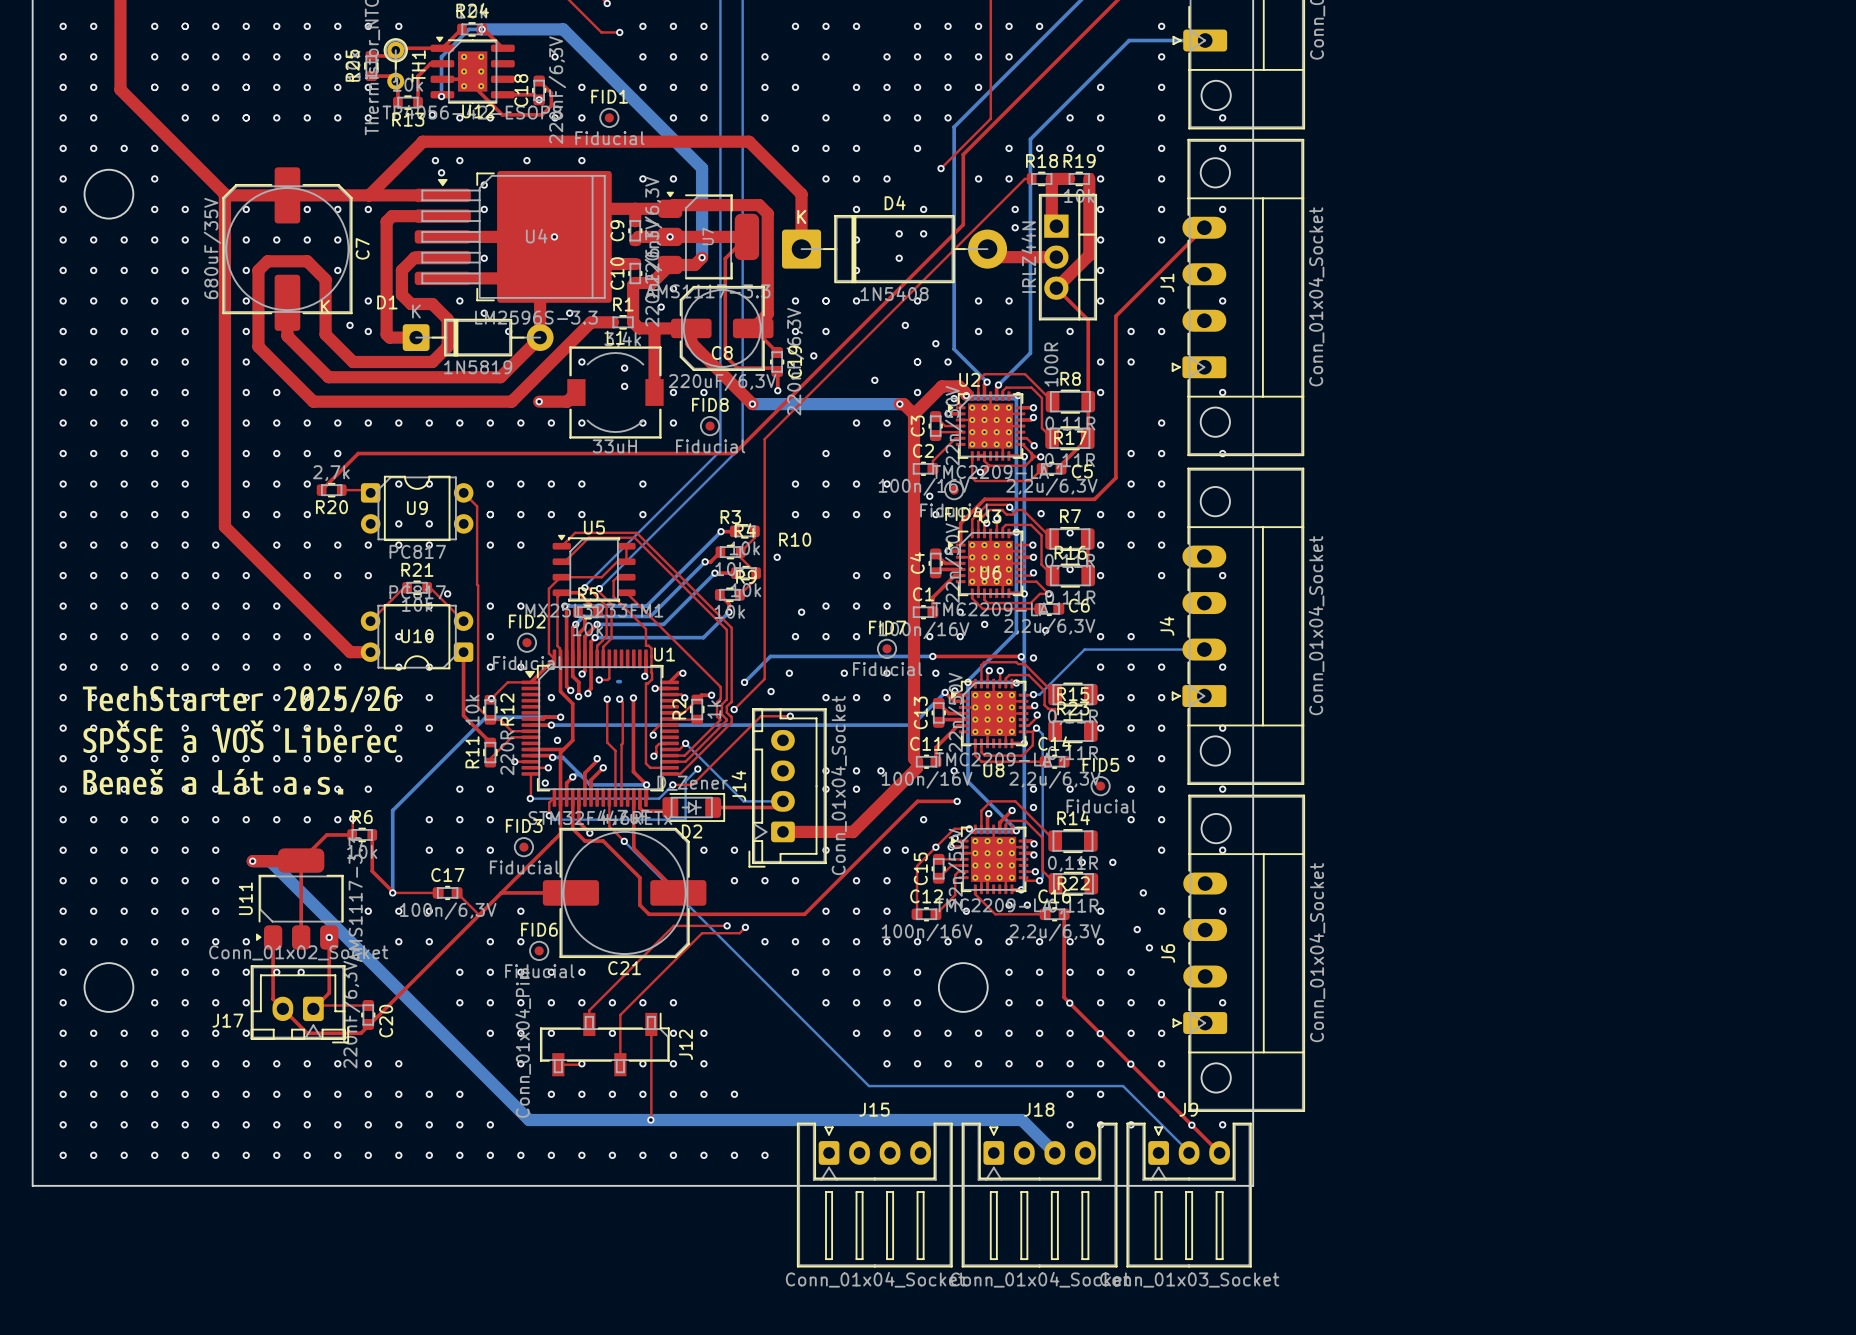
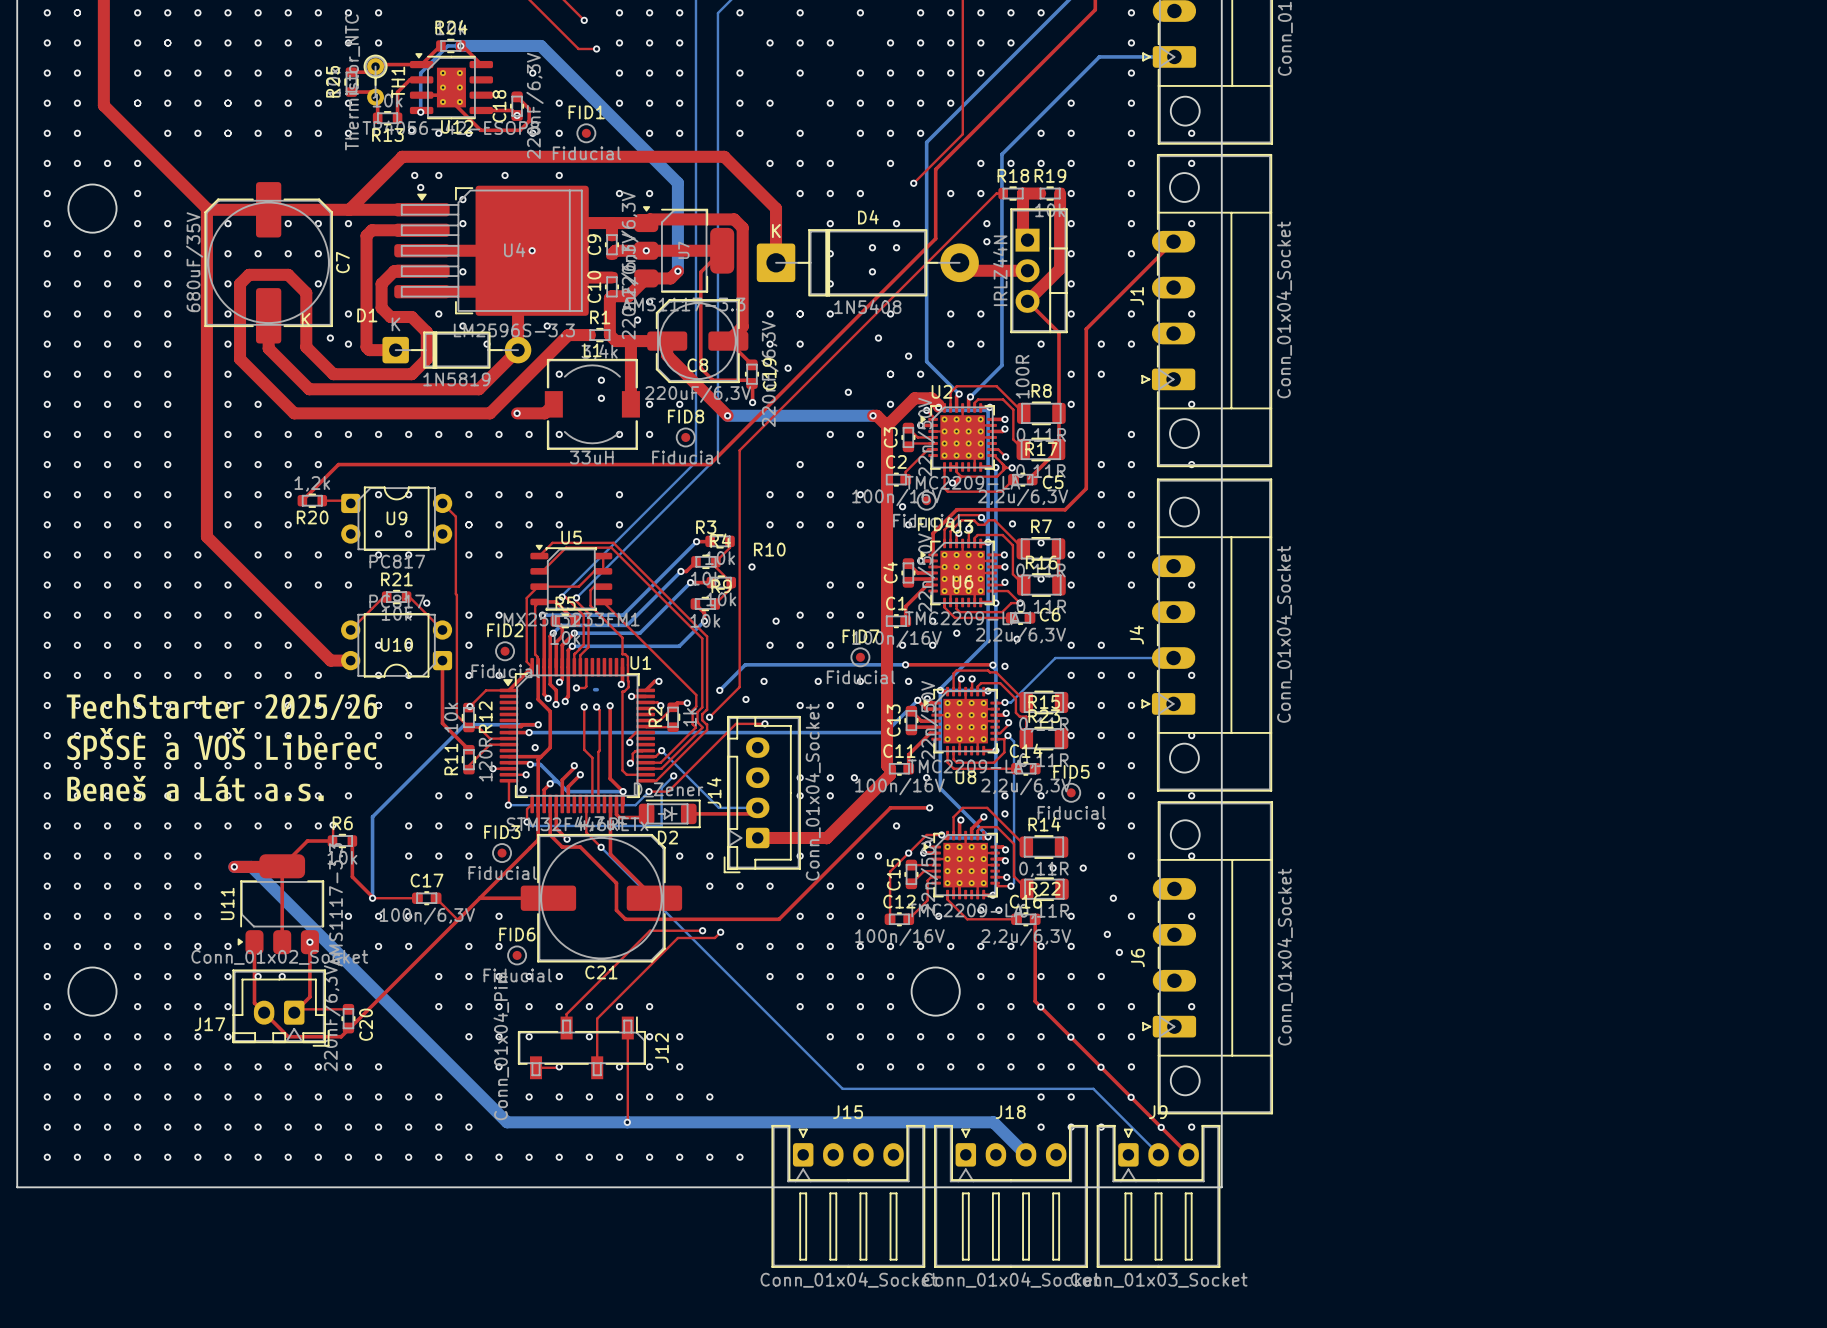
R20 value: 2,7k (331, 473) -> 1,2k (312, 483)
R11 value: 220R (507, 752) -> 120R (485, 759)

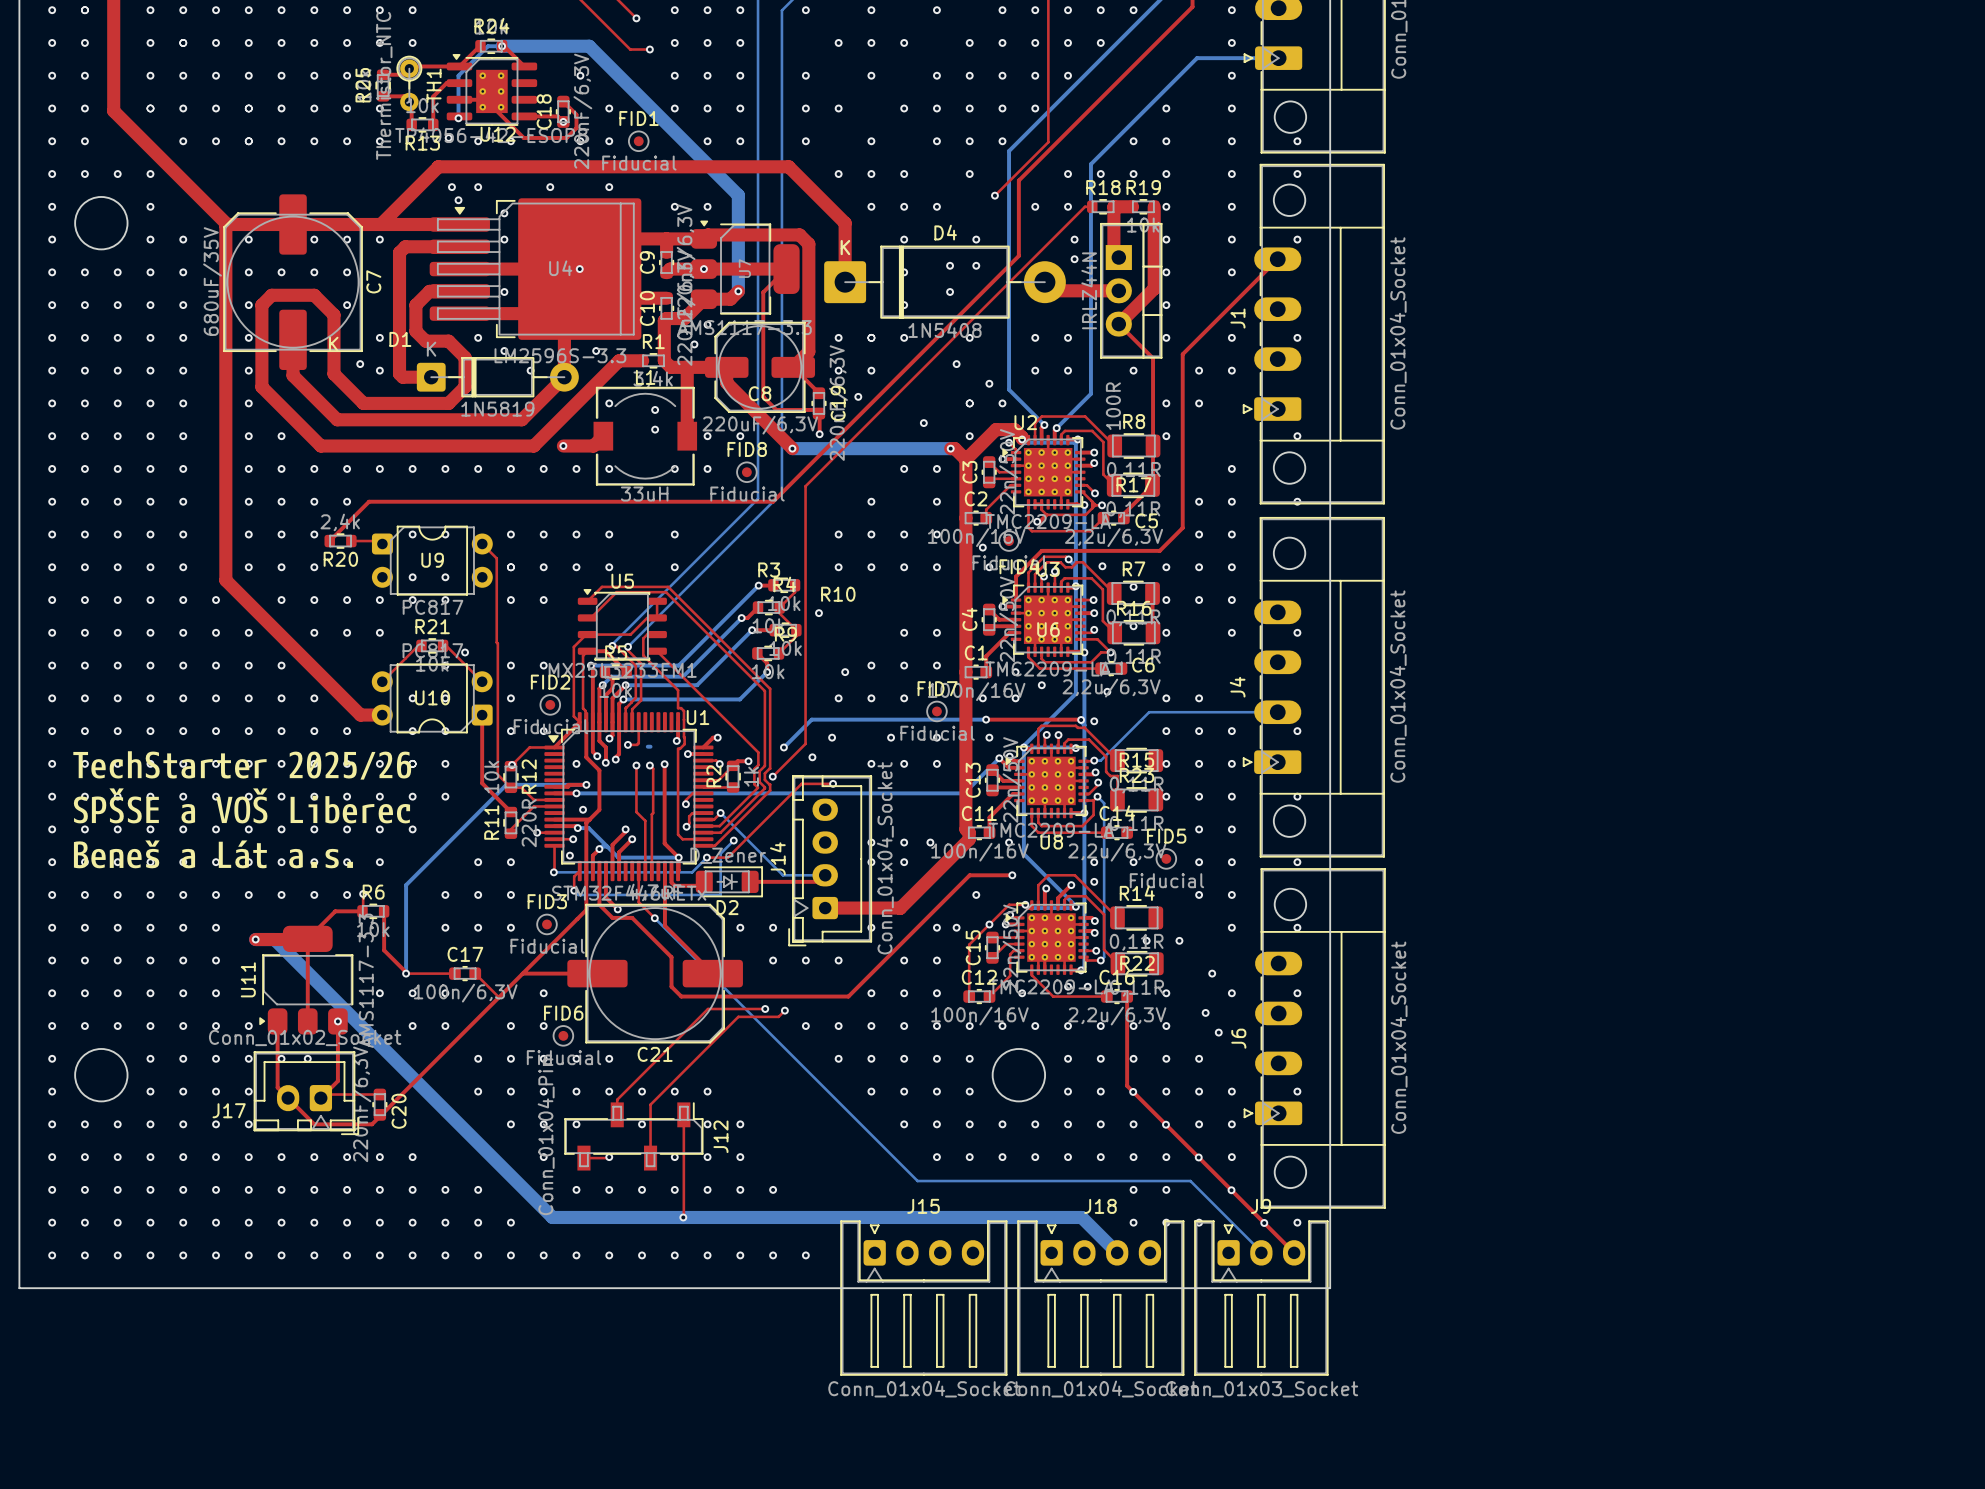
R20 value: 1,2k (312, 483) -> 2,4k (340, 522)
R11 value: 120R (485, 759) -> 220R (529, 823)

